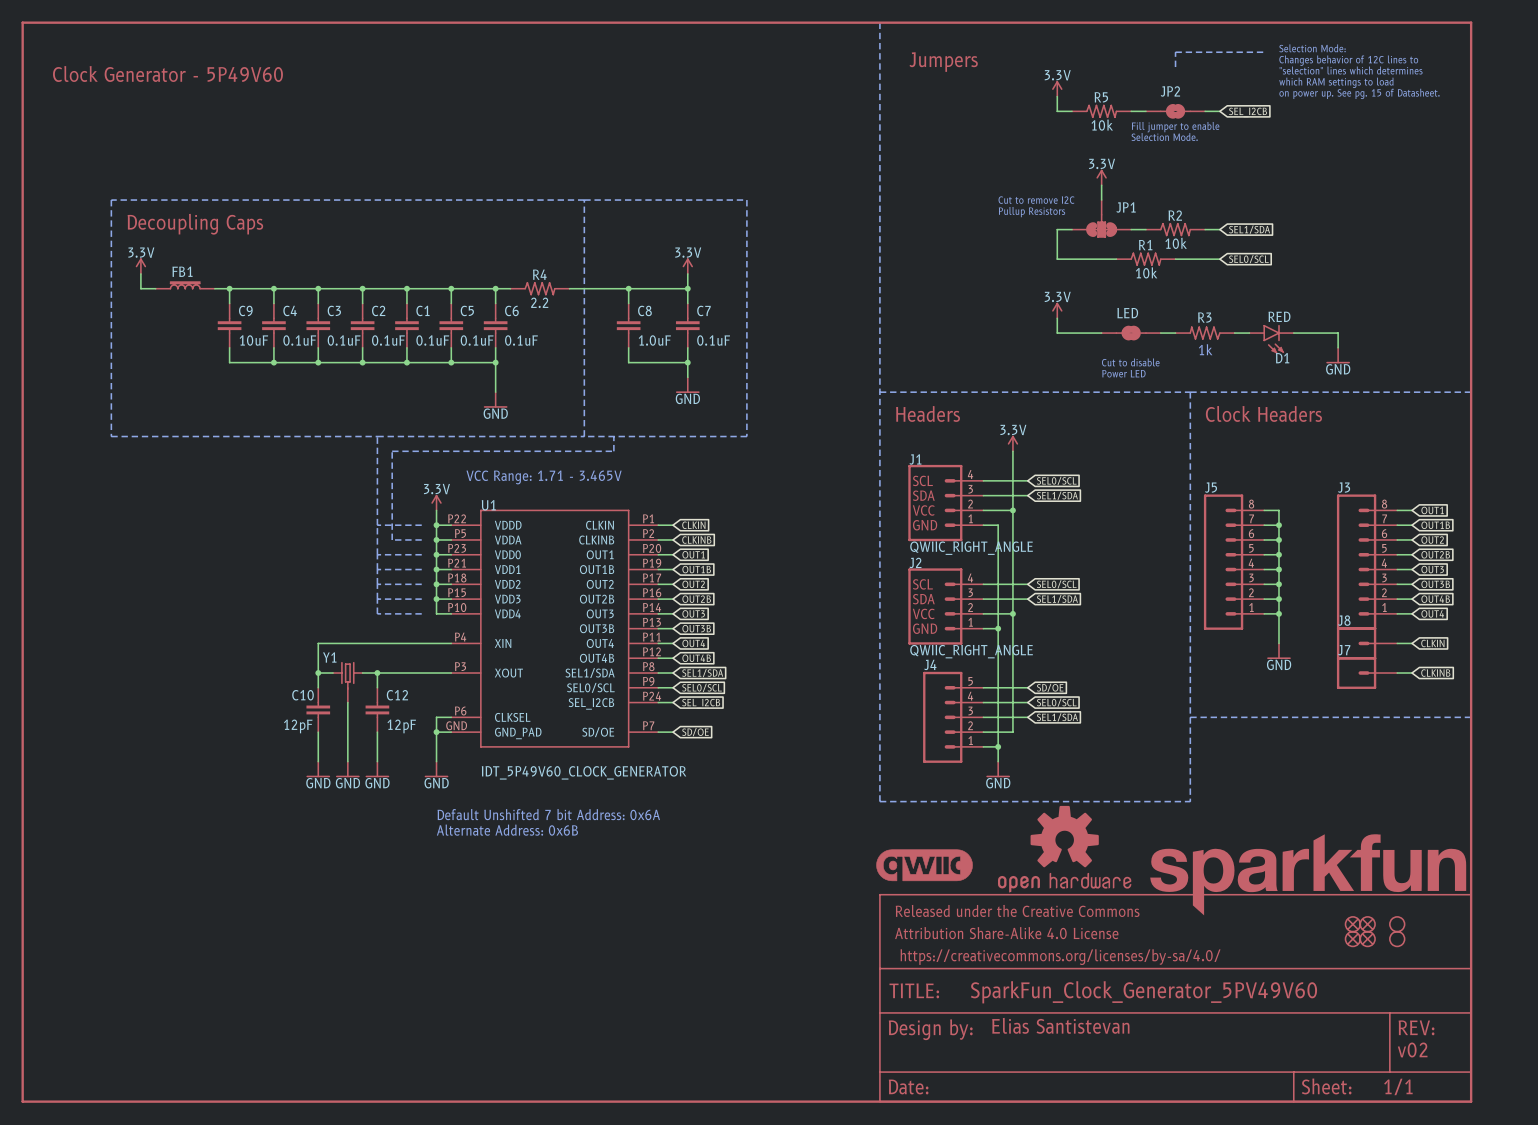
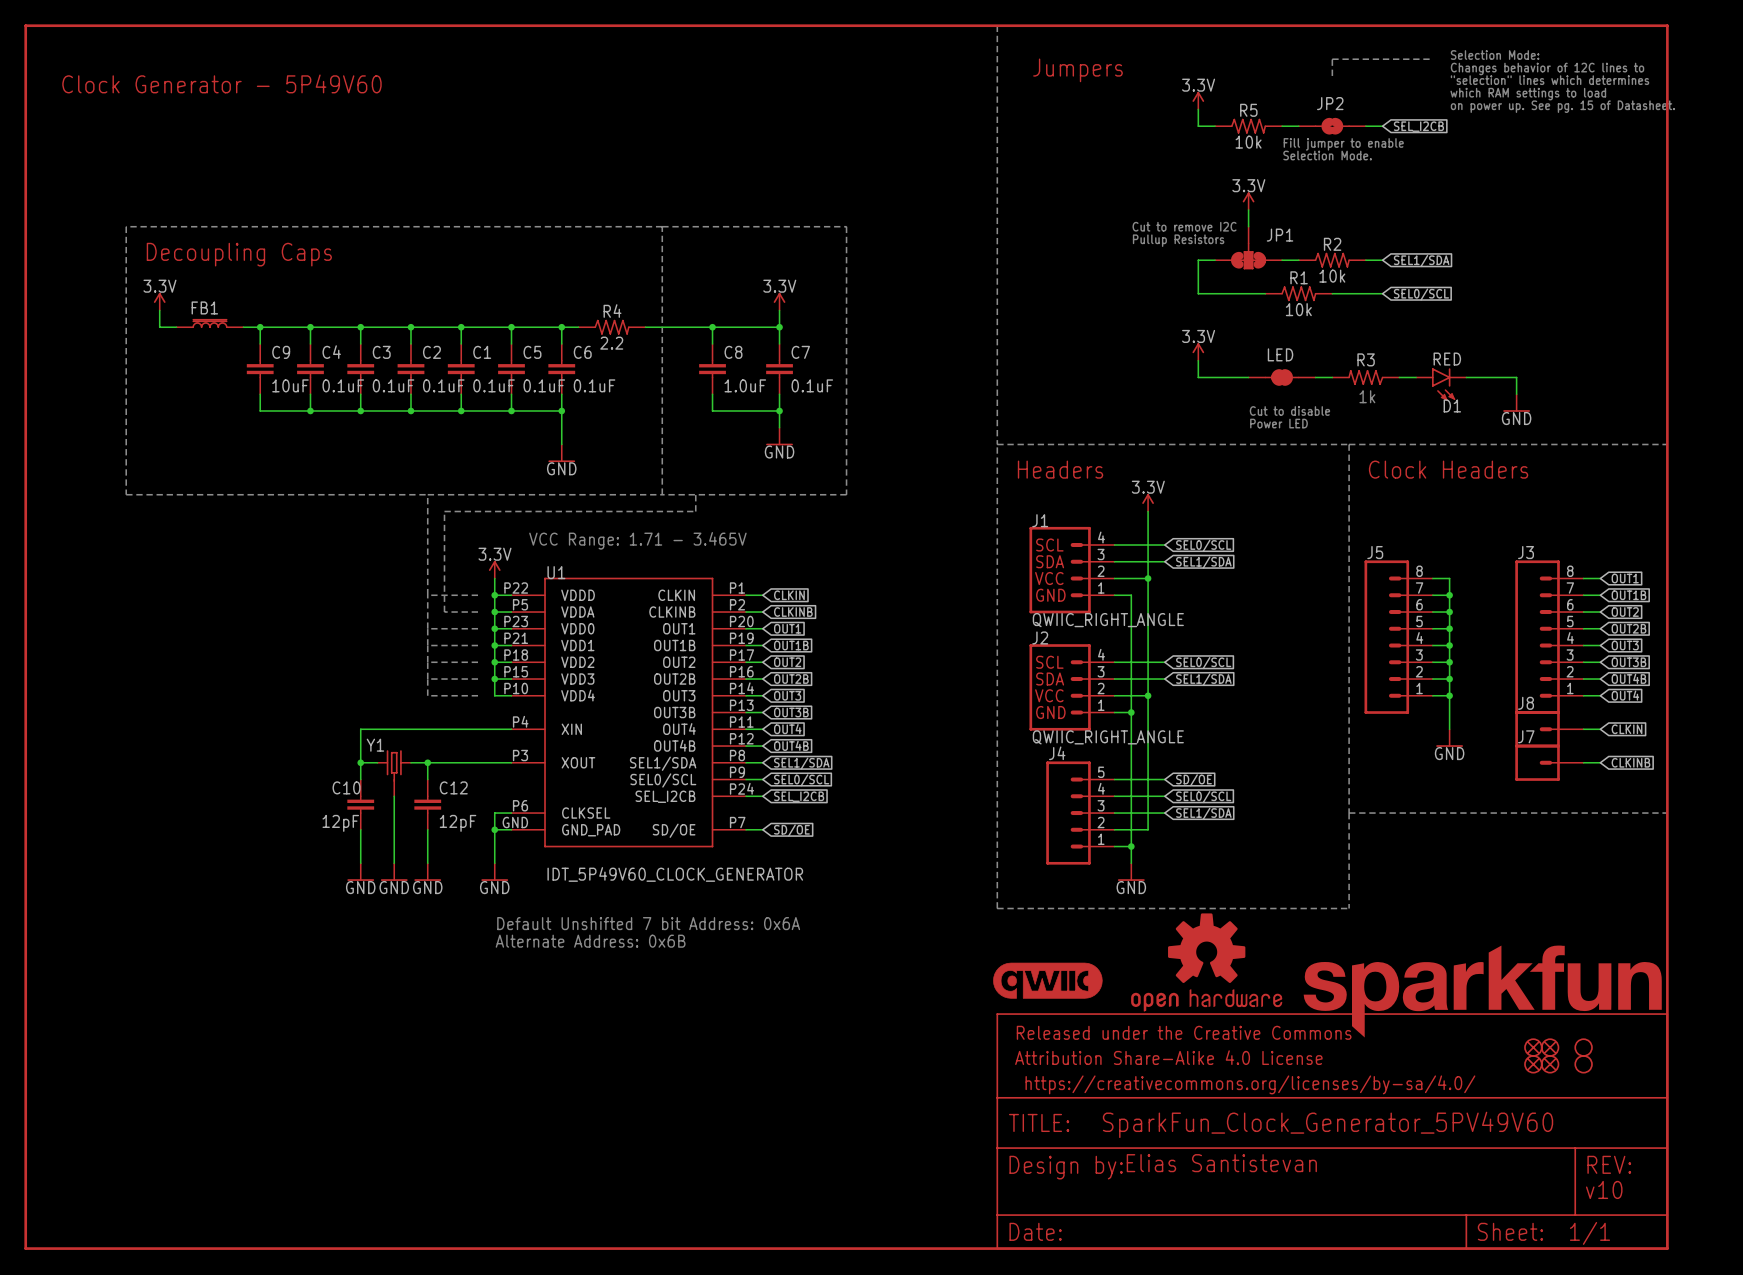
text: v02 (1412, 1050) -> v10 (1604, 1189)

